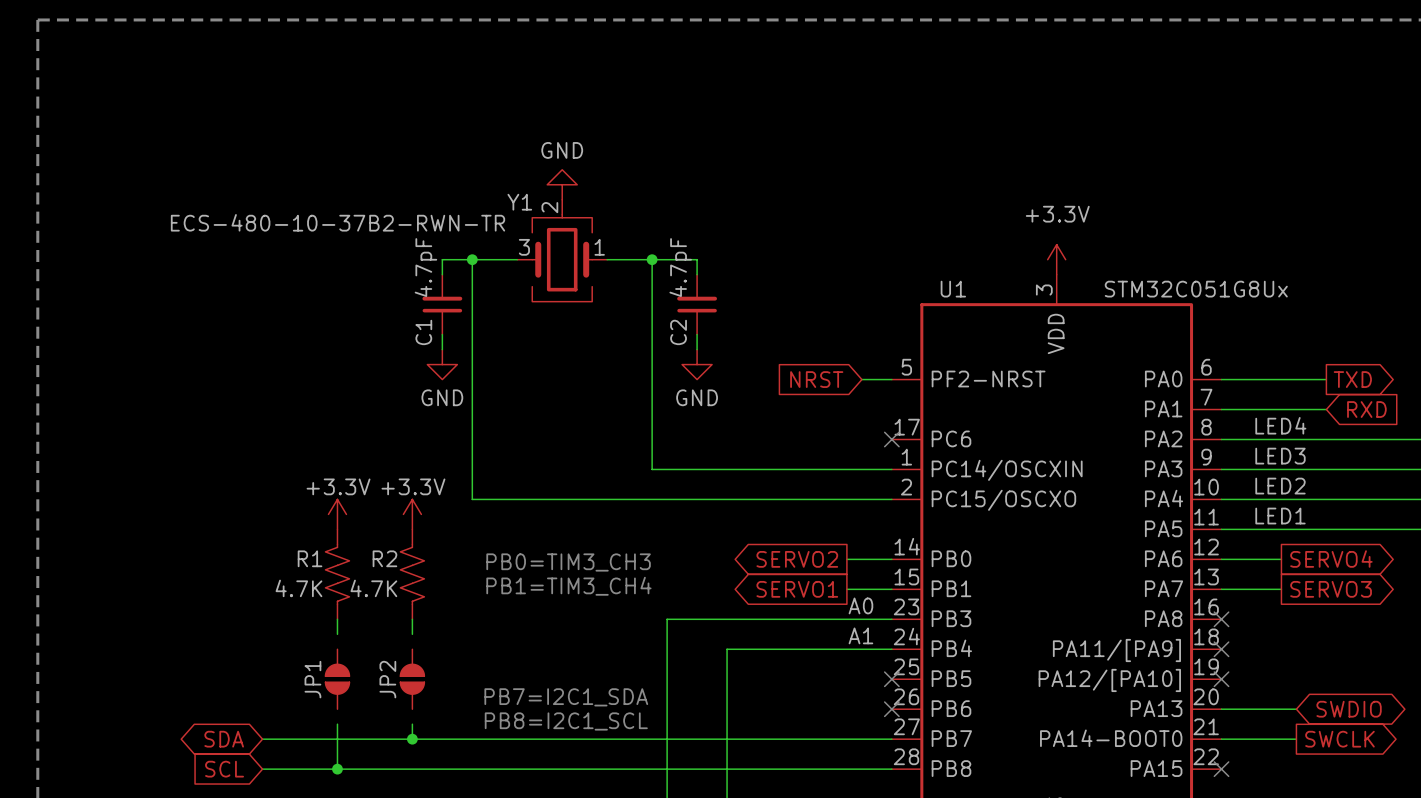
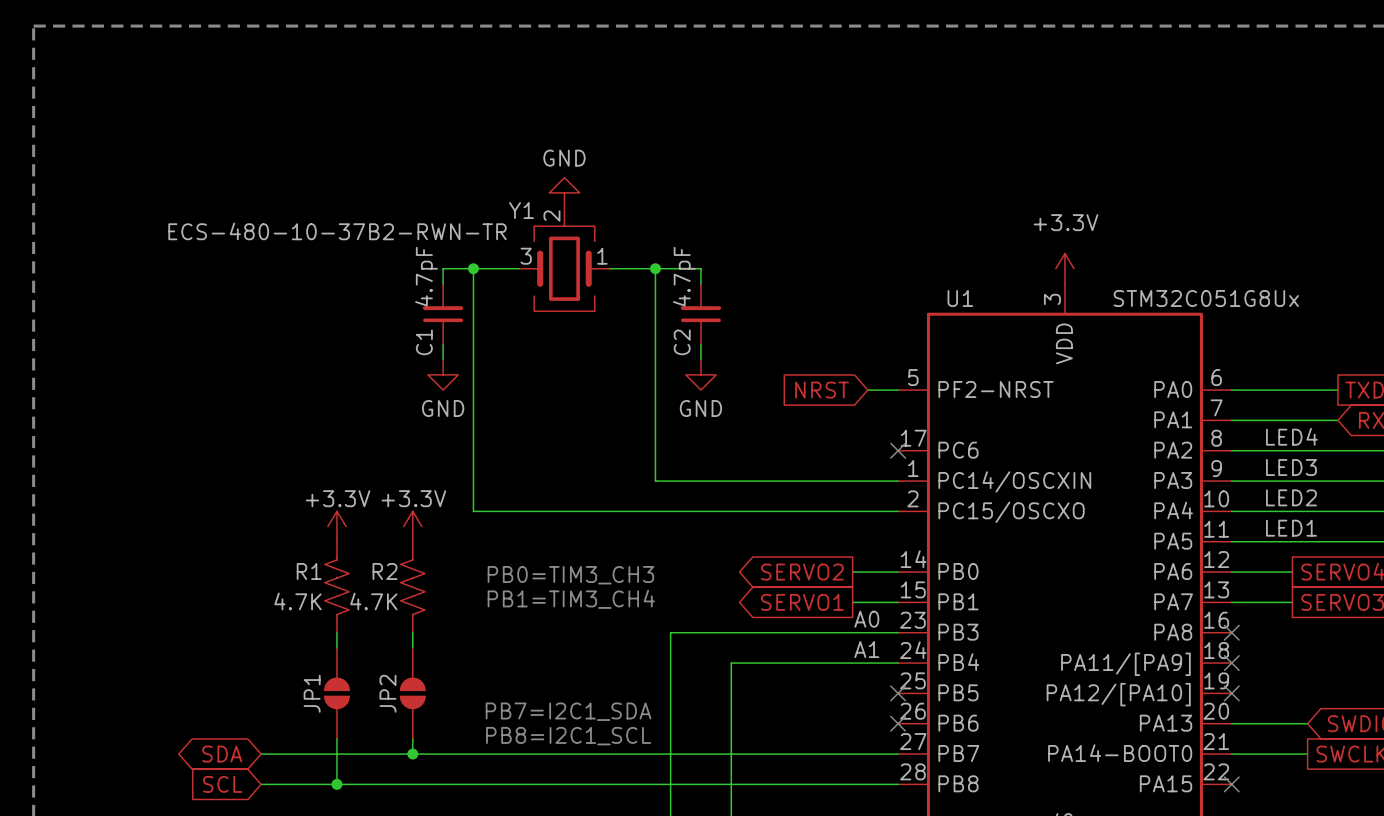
JP1 symbol: [325, 649, 350, 710] -> [324, 647, 350, 739]
JP2 symbol: [400, 649, 425, 710] -> [400, 647, 425, 739]

